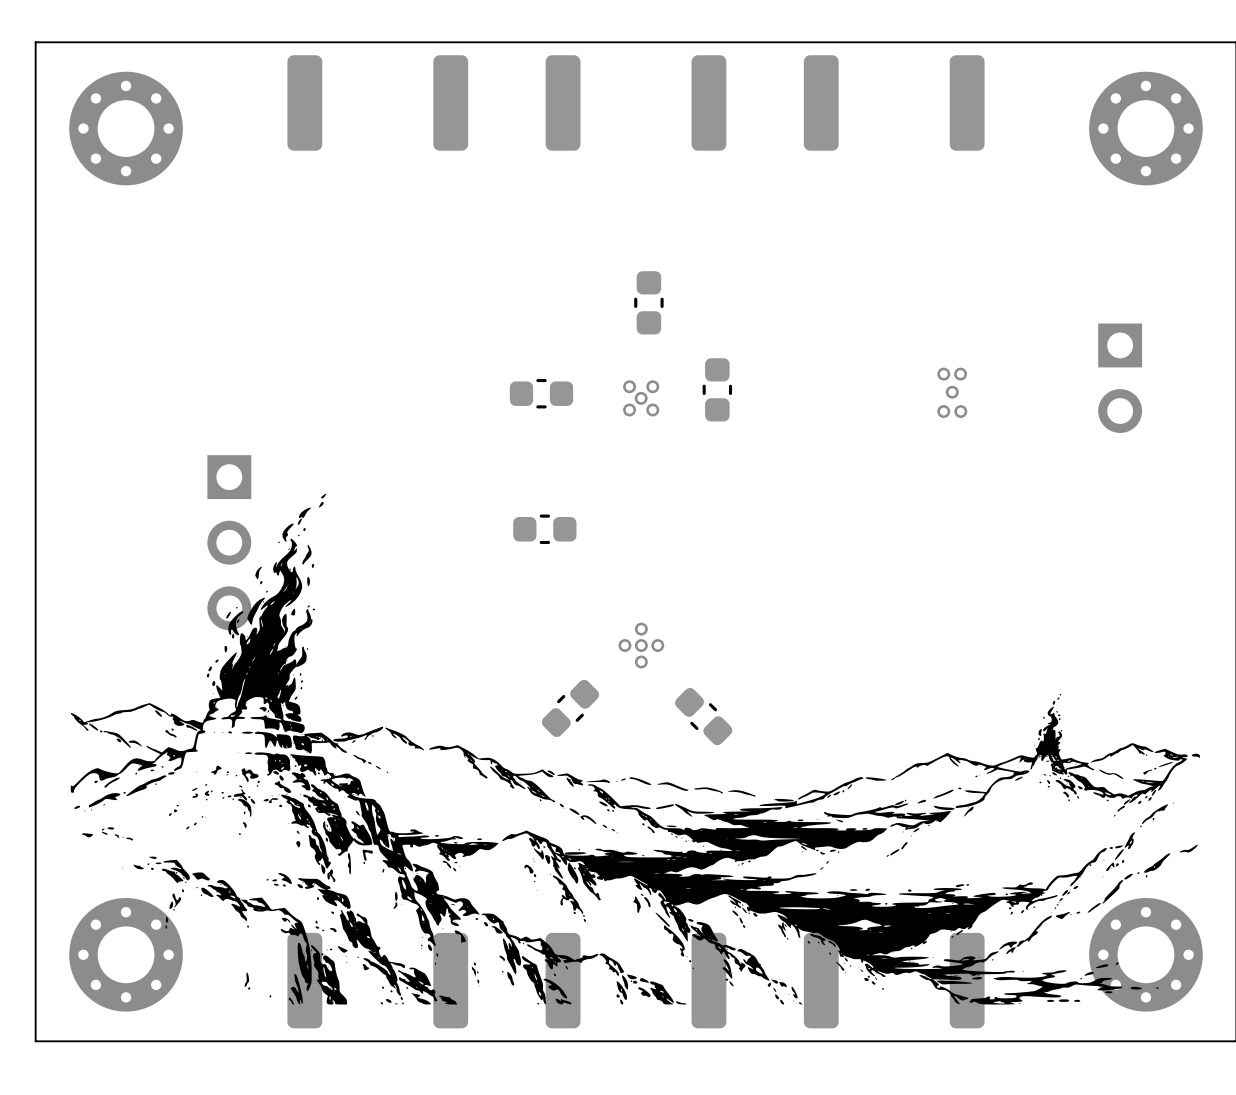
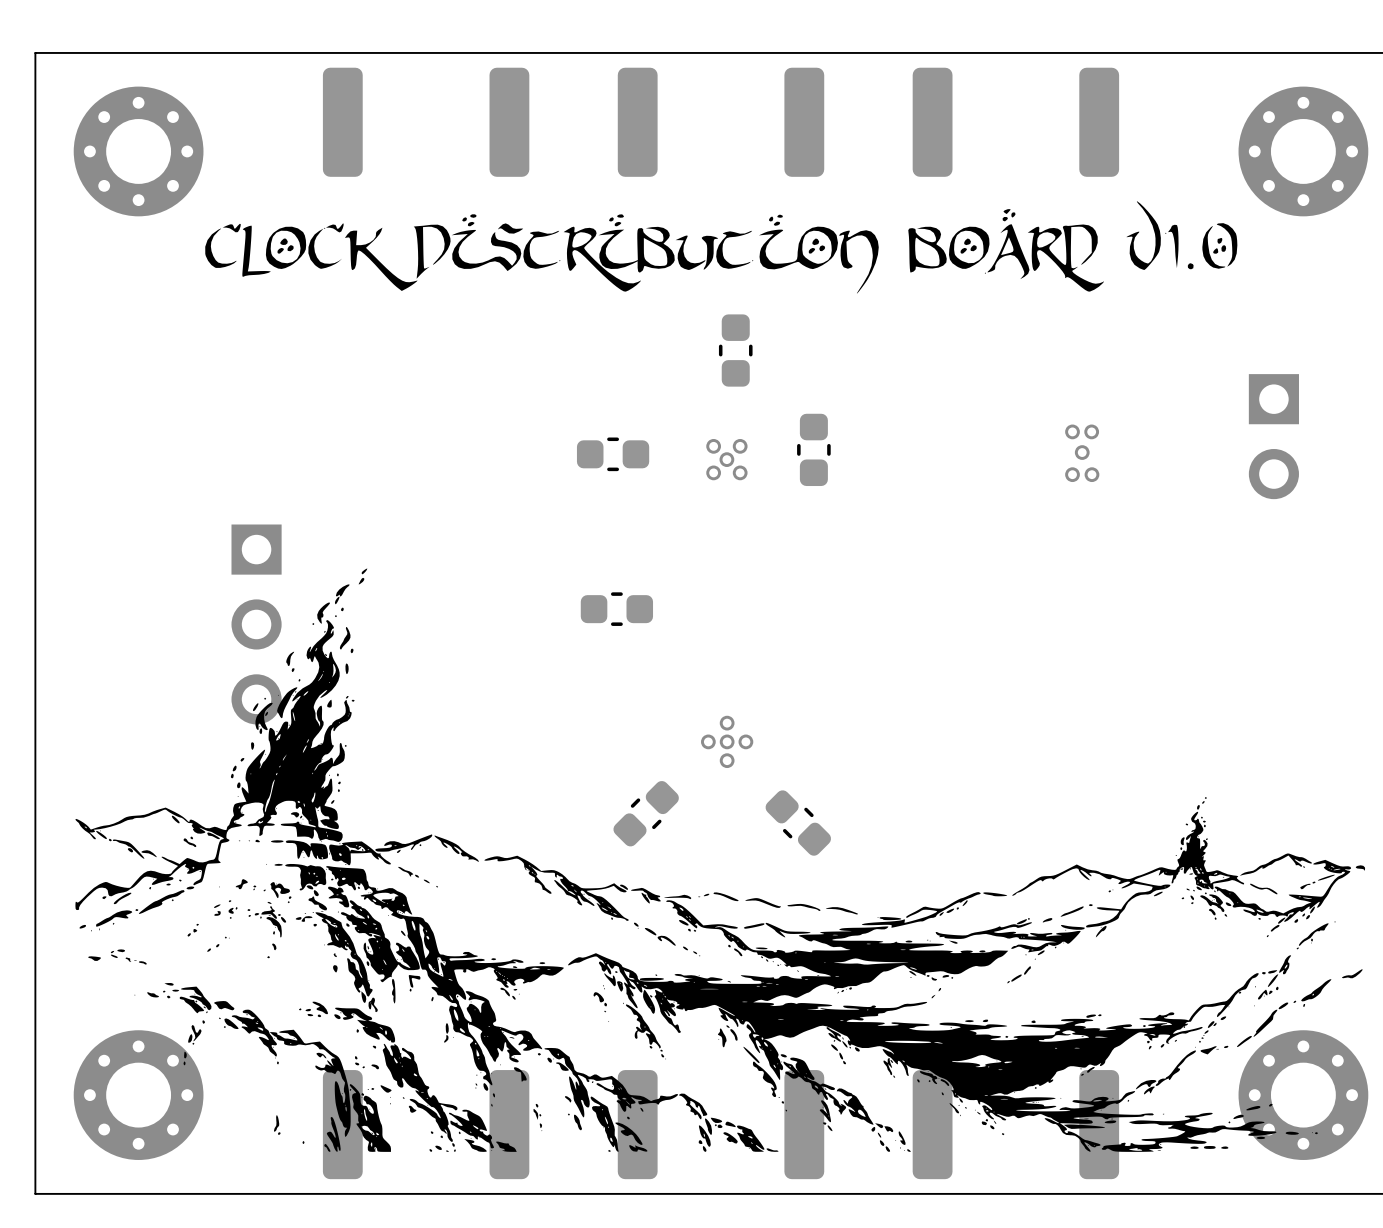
drawing: none -> [205, 201, 1238, 294]

